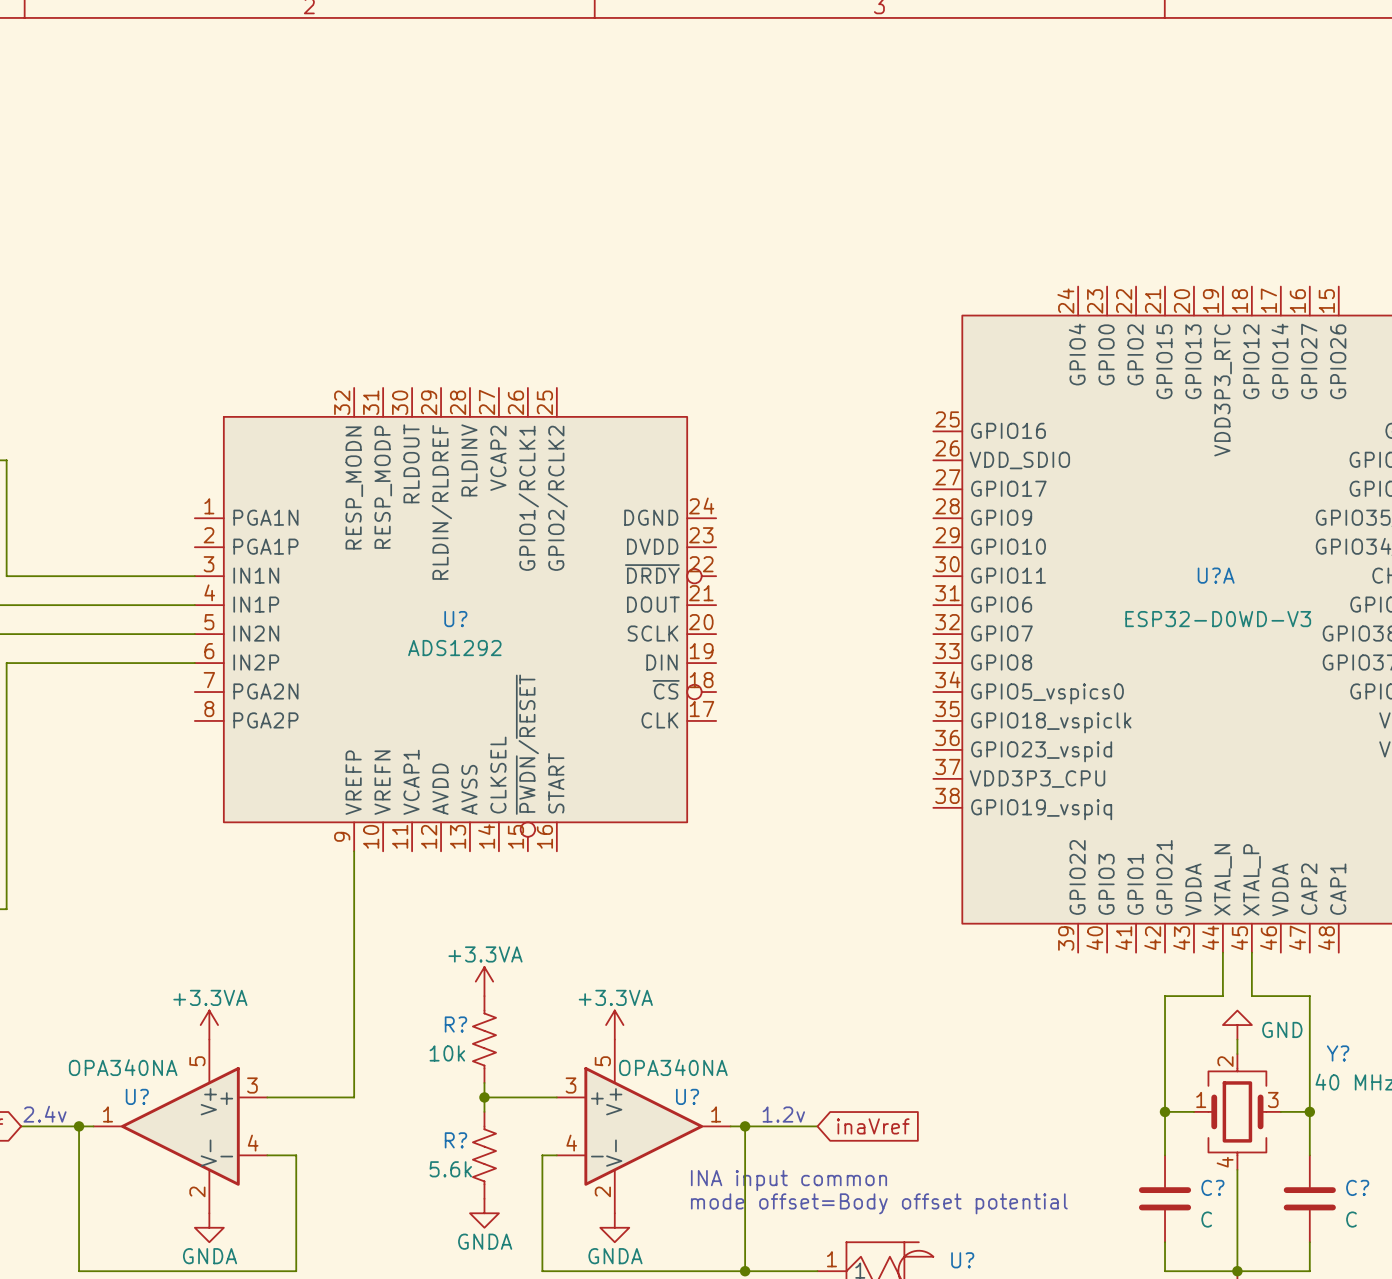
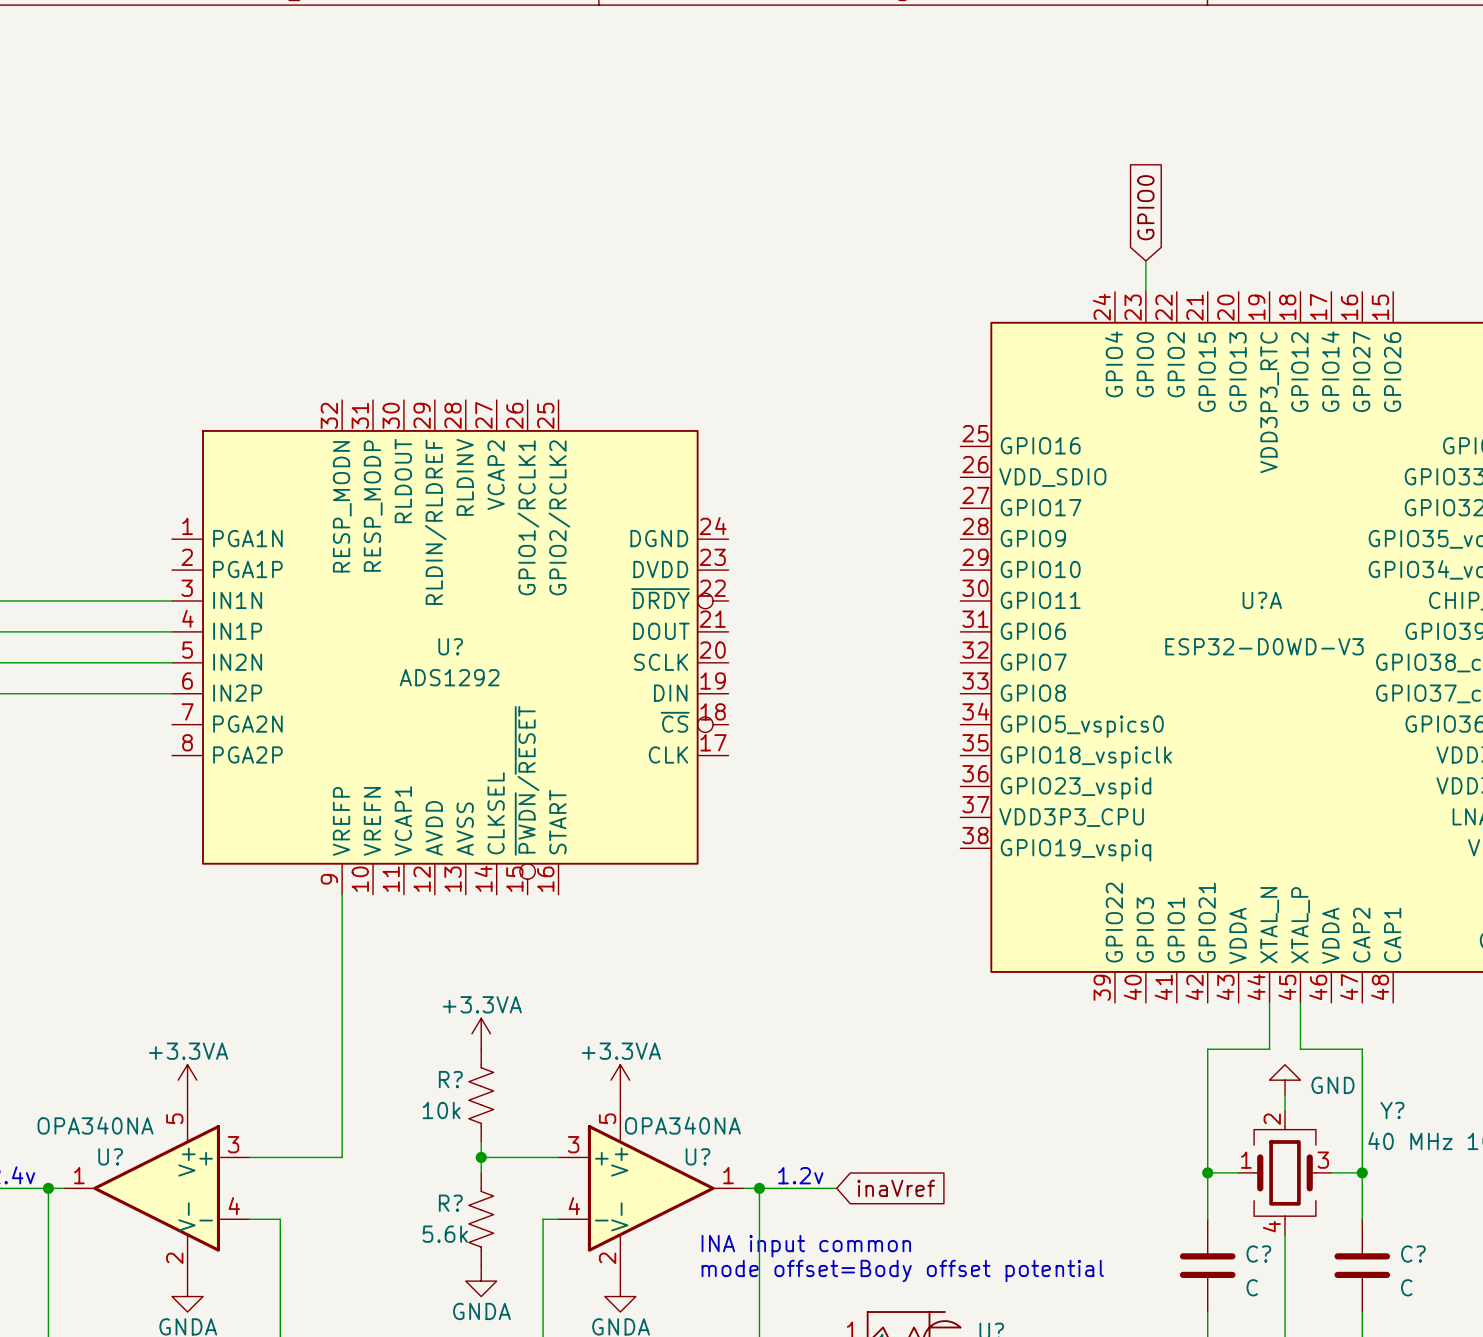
global label: none -> GPIO0 (1145, 207)
wire: none -> (1145, 260) (1145, 291)

